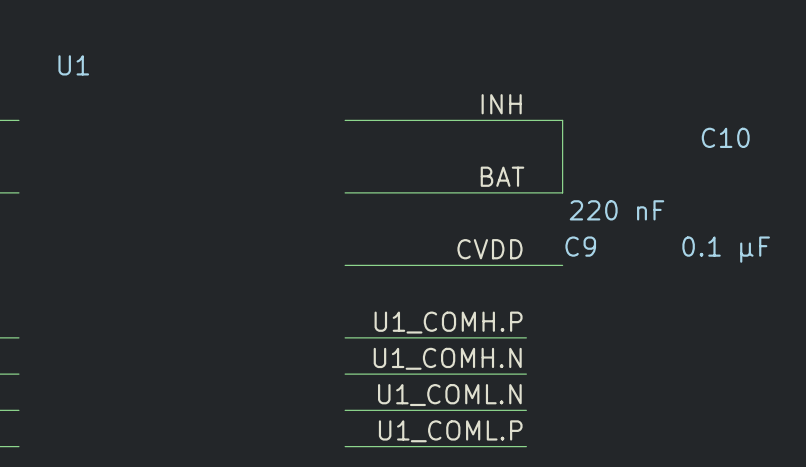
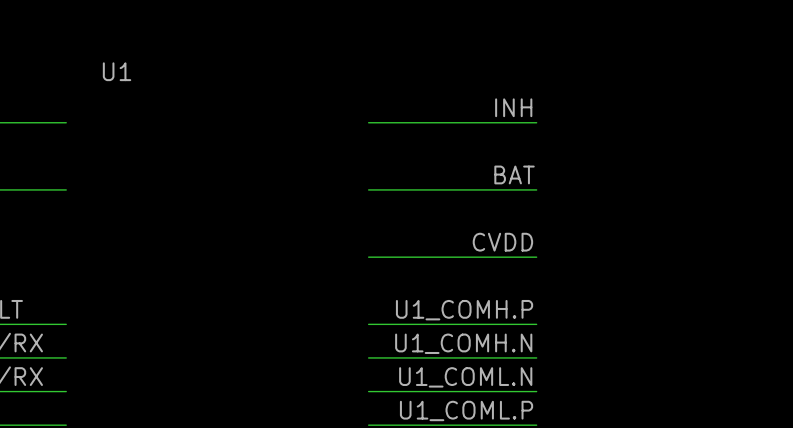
wire: (526, 120) (562, 120) (562, 192) (526, 192) -> none
C10: 0.1 µF (726, 195) -> none
C9: 220 nF (614, 228) -> none
wire: (526, 265) (562, 265) -> none

